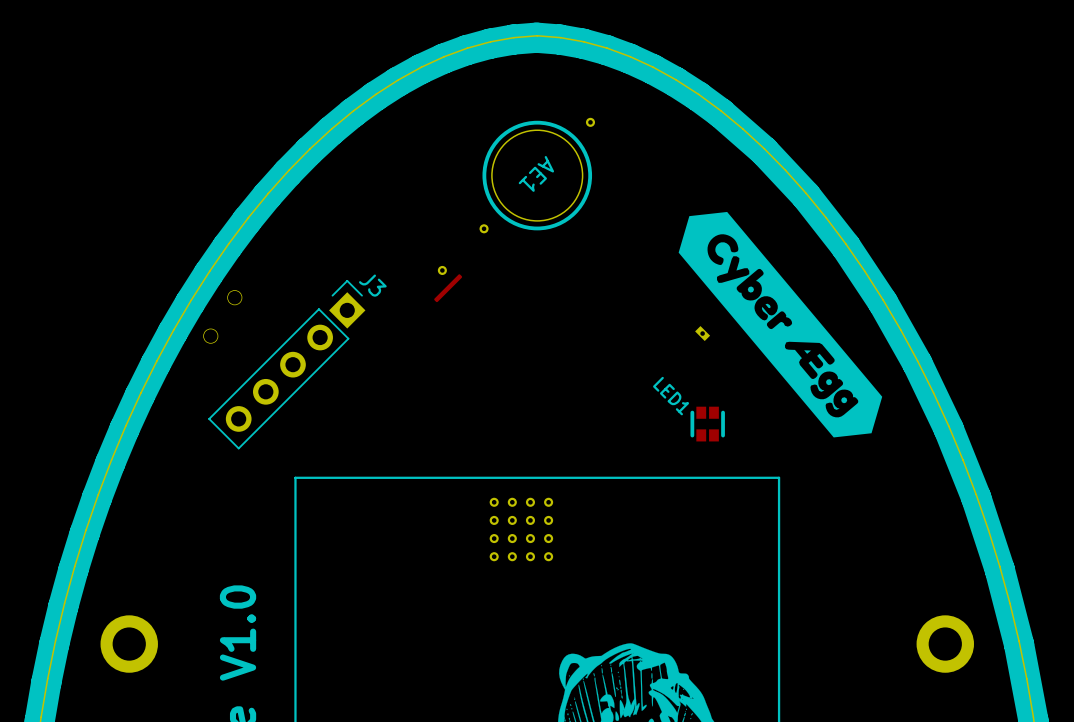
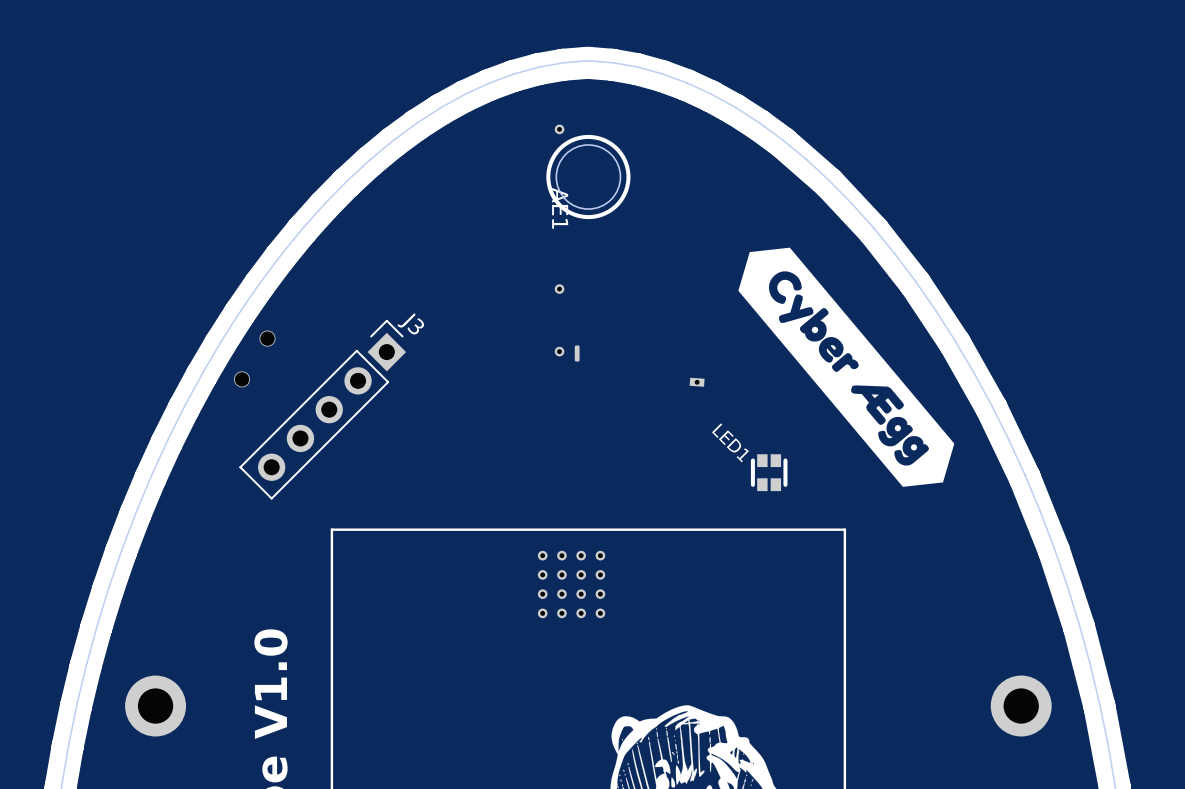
drawing: none -> [546, 134, 631, 220]
round board edge: none -> [556, 144, 621, 210]
AE1 footprint: [434, 117, 596, 303] -> [554, 124, 580, 362]
drawing: [482, 120, 593, 231] -> none
round board edge: [491, 130, 583, 221] -> none
part: (702, 333) -> none
part: none -> (697, 382)

